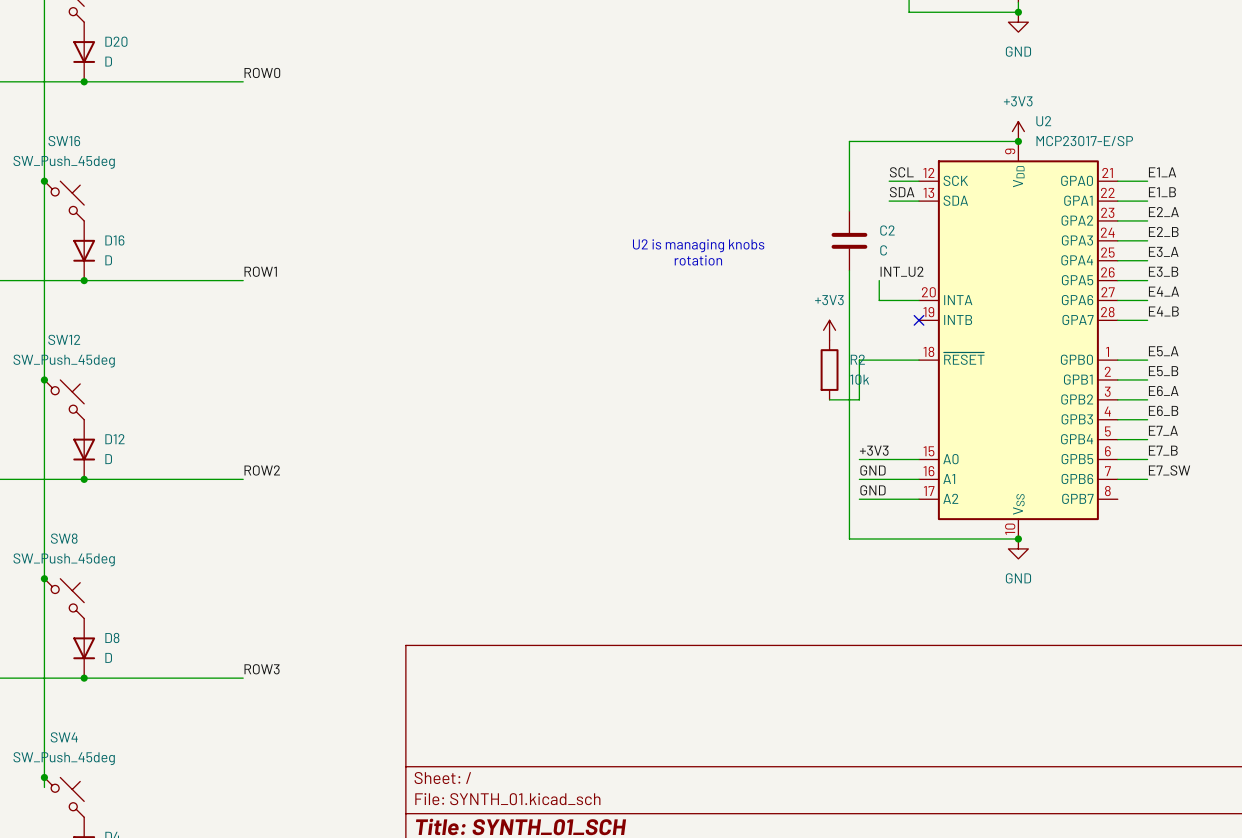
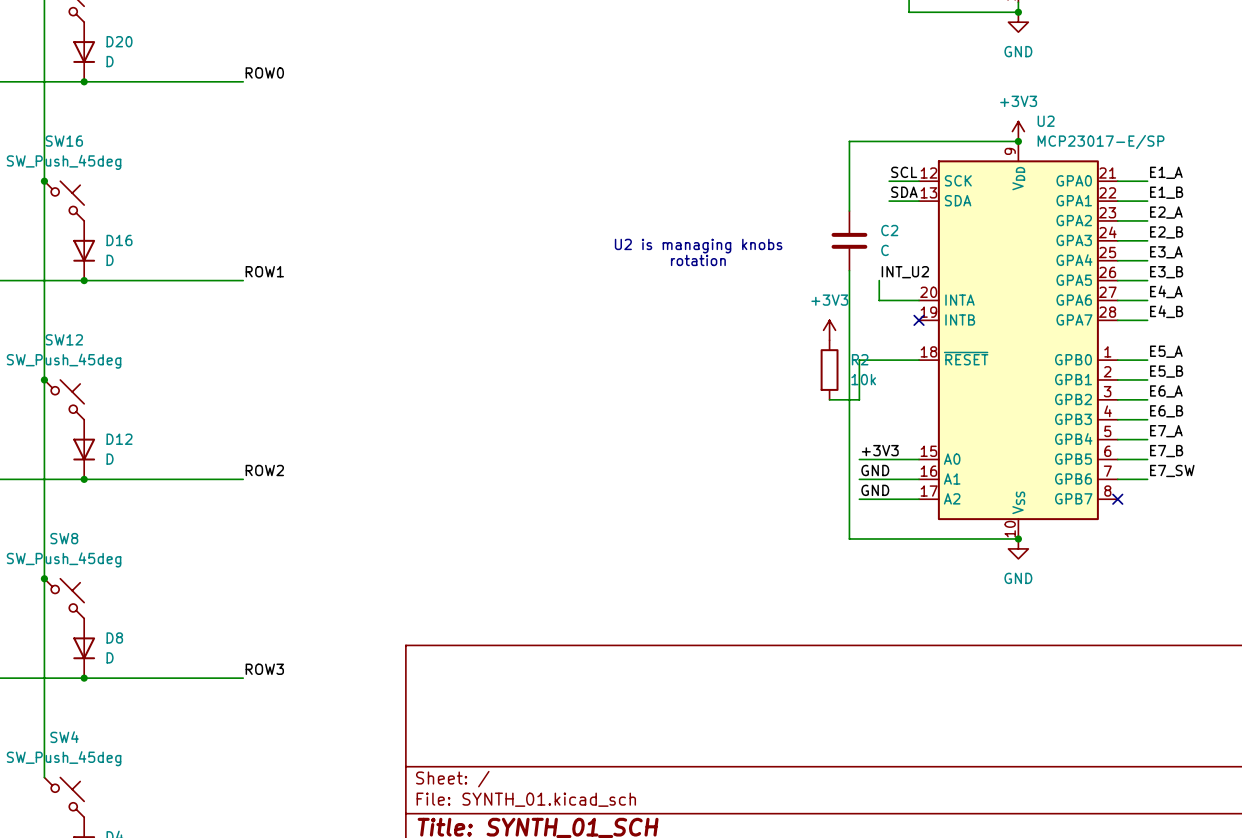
no-connect mark: none -> (1117, 499)
wire: (44, 777) (44, 787) -> none
junction: (44, 777) -> none

